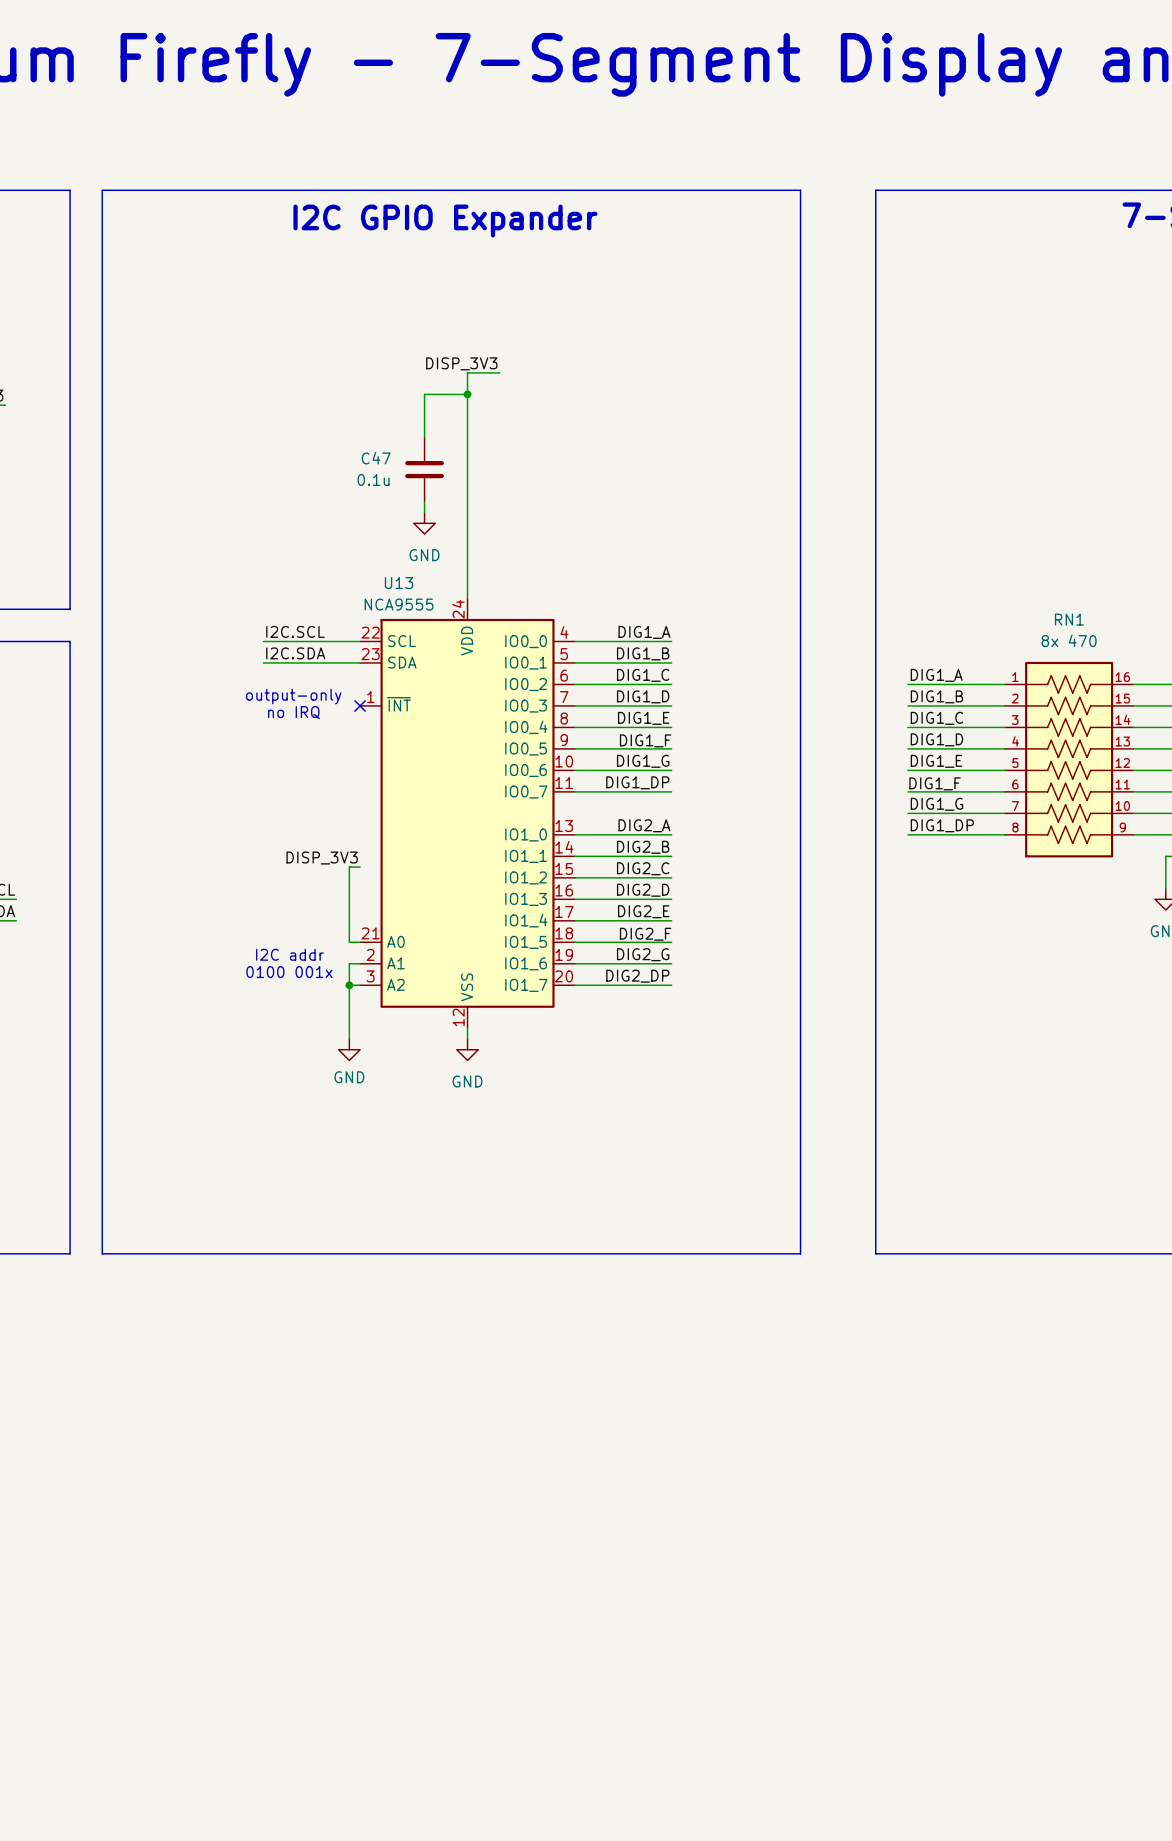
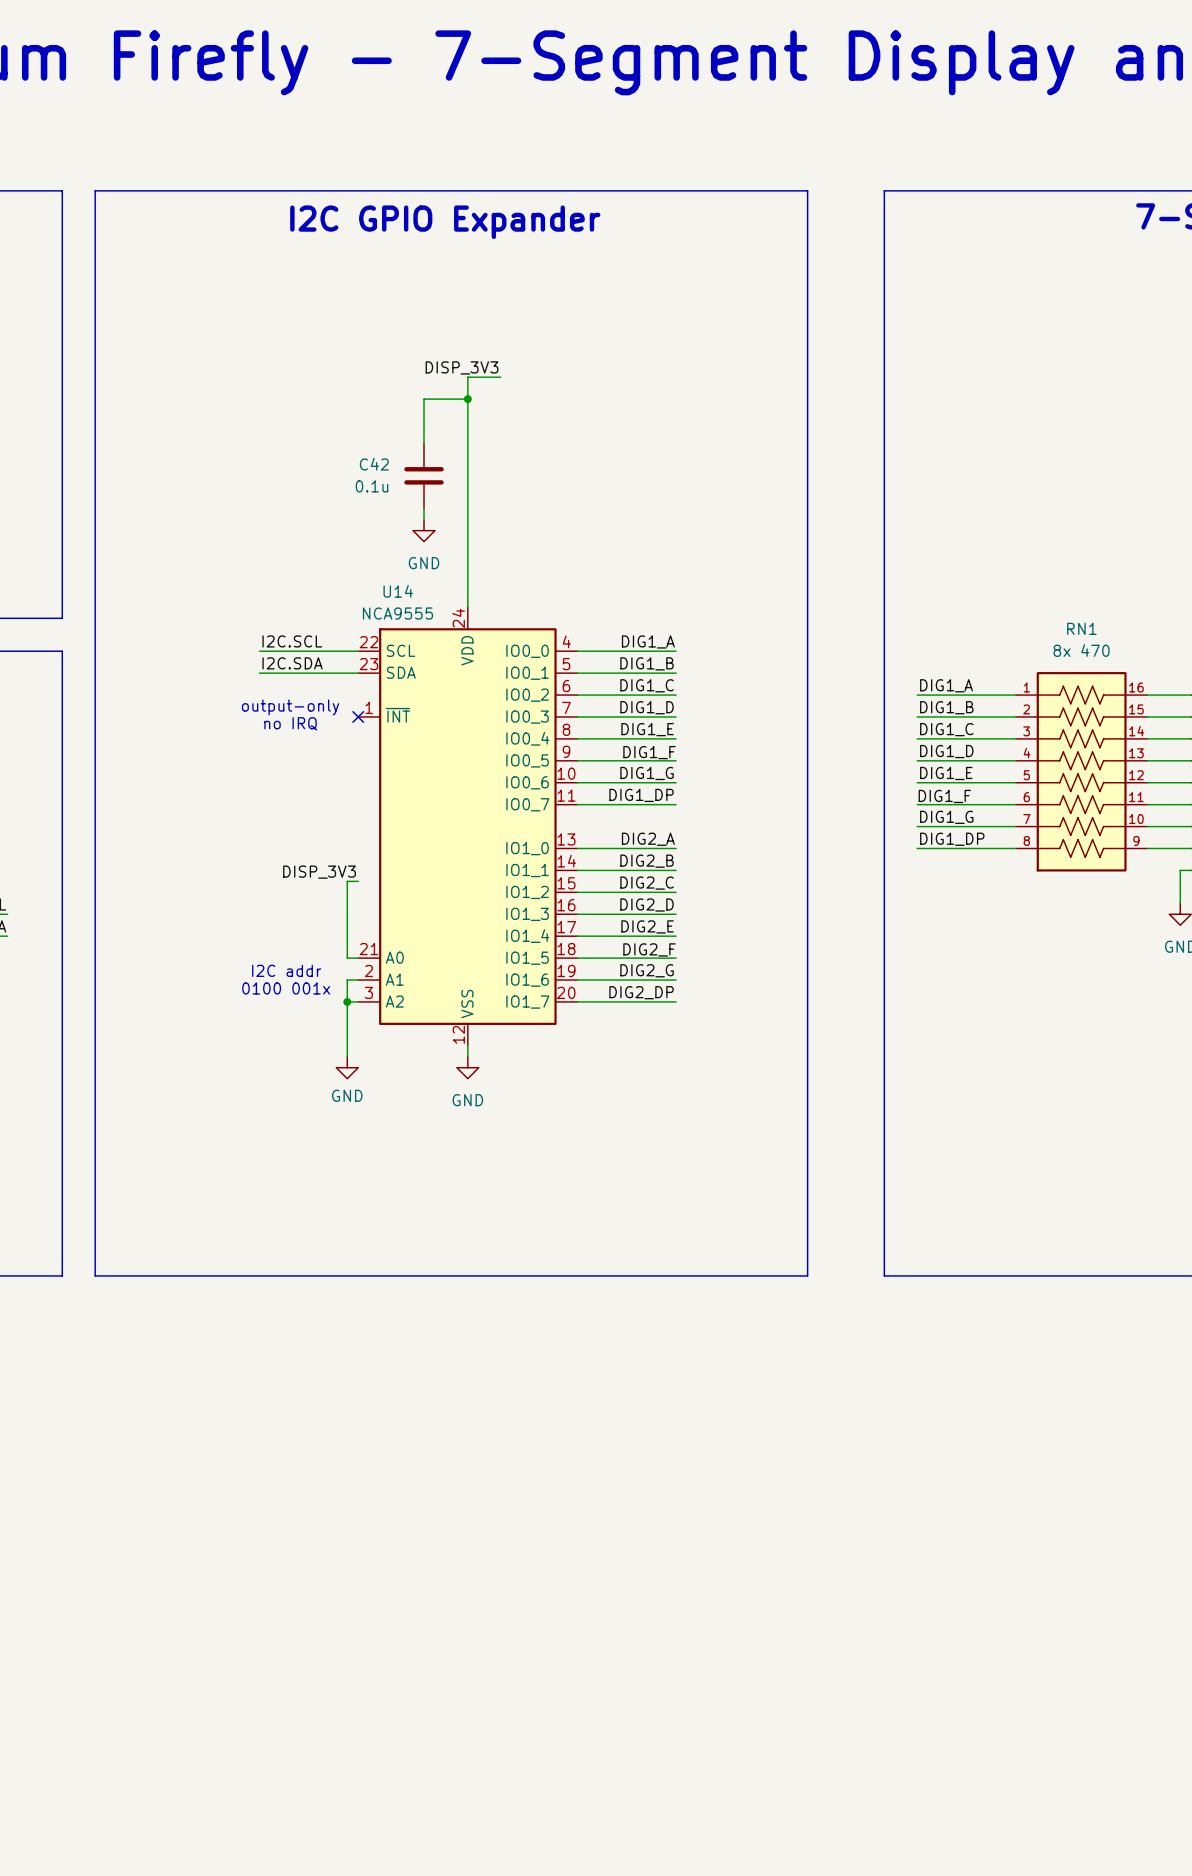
C47 name: C47 (376, 458) -> C42 (374, 464)
U13 name: U13 (399, 583) -> U14 (398, 591)

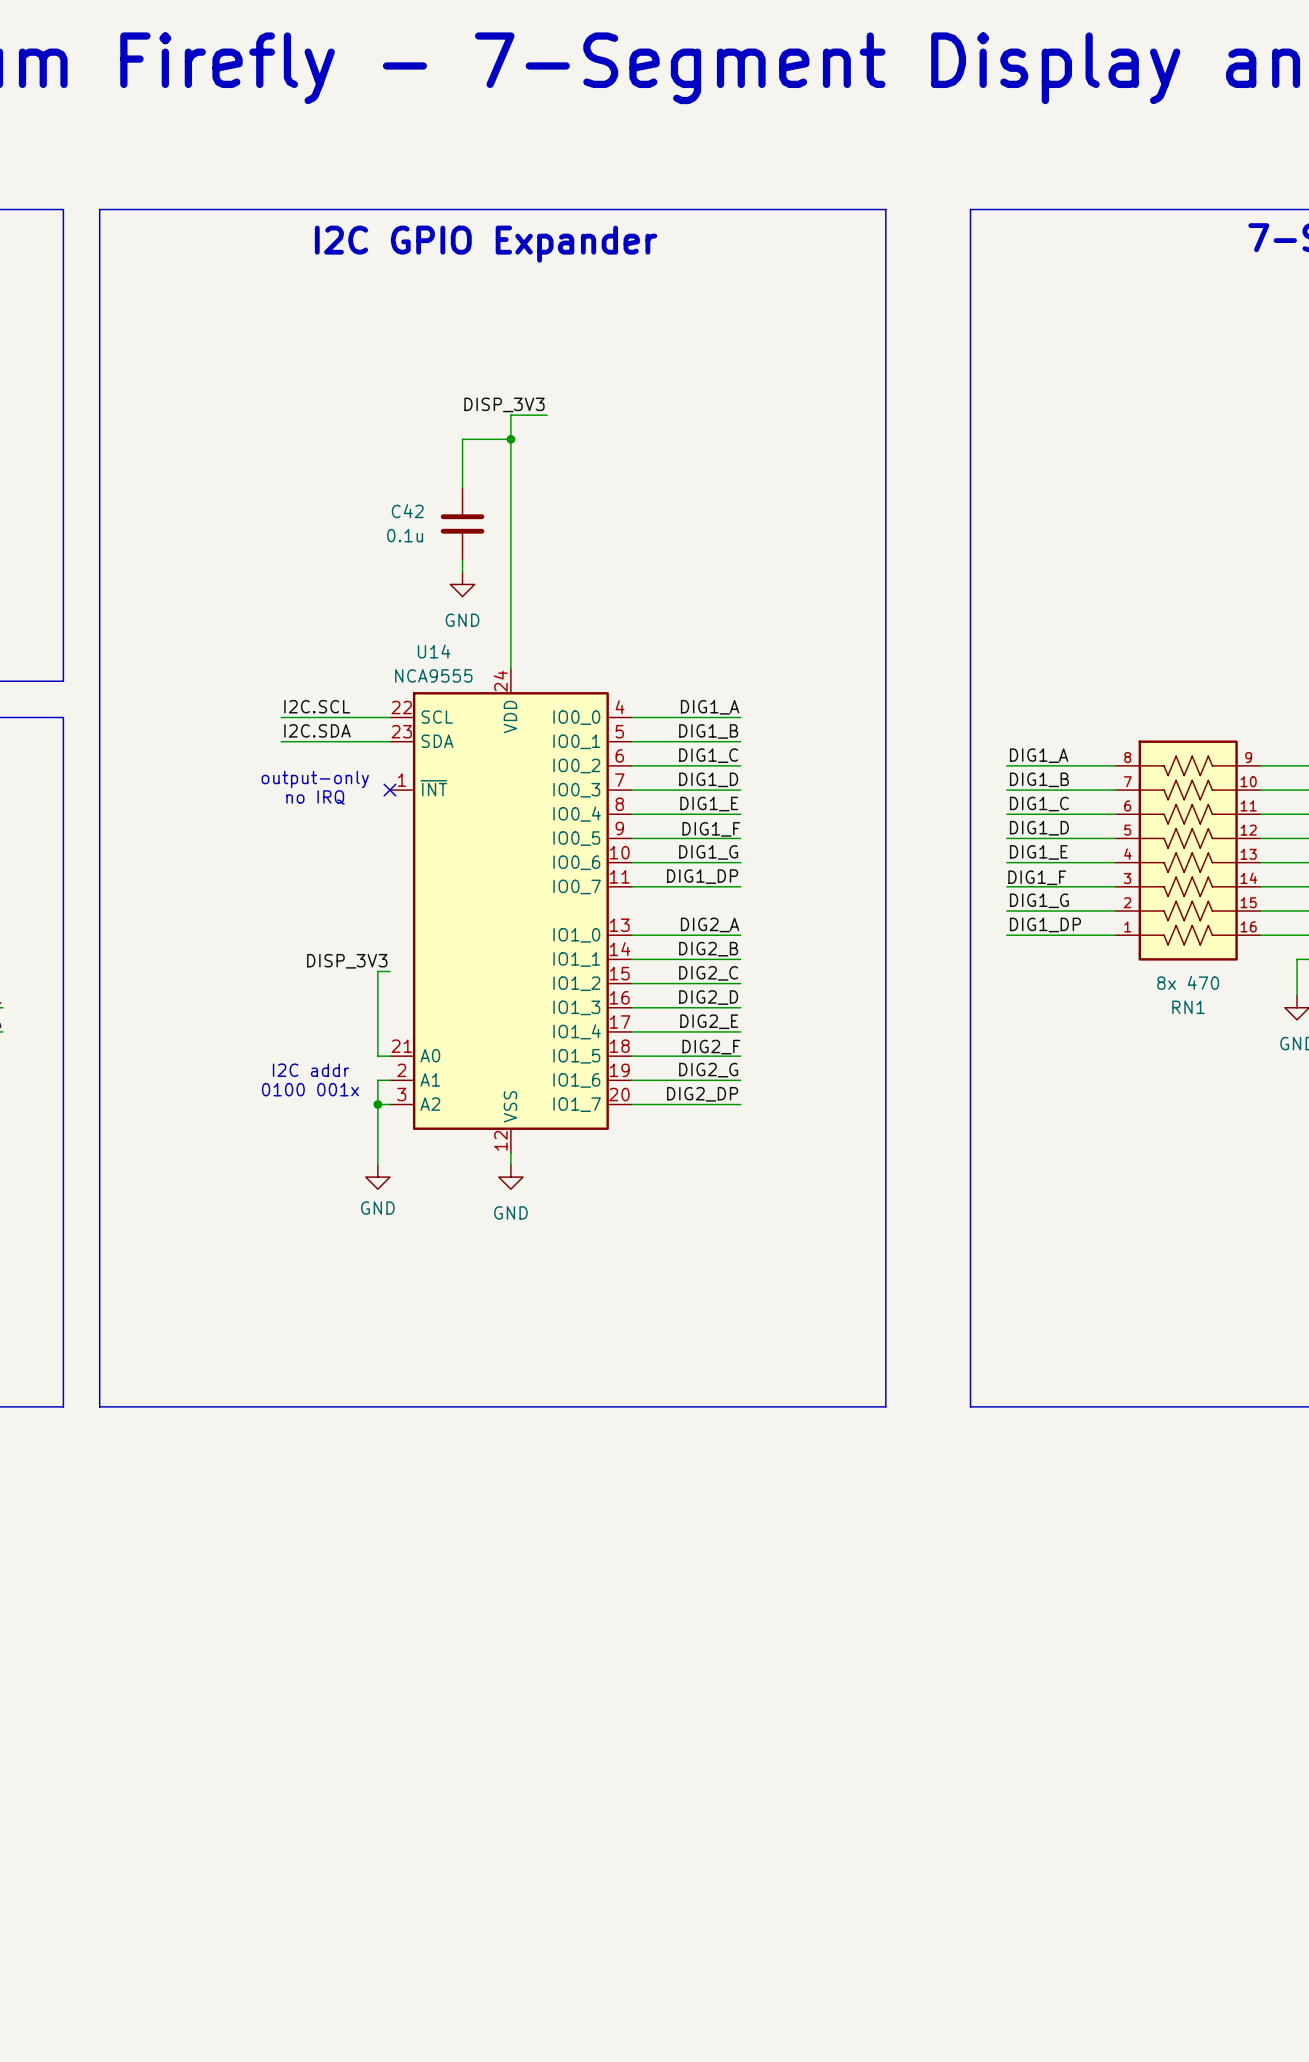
RN1 flip: as is (1081, 771) -> up-down (1188, 850)

